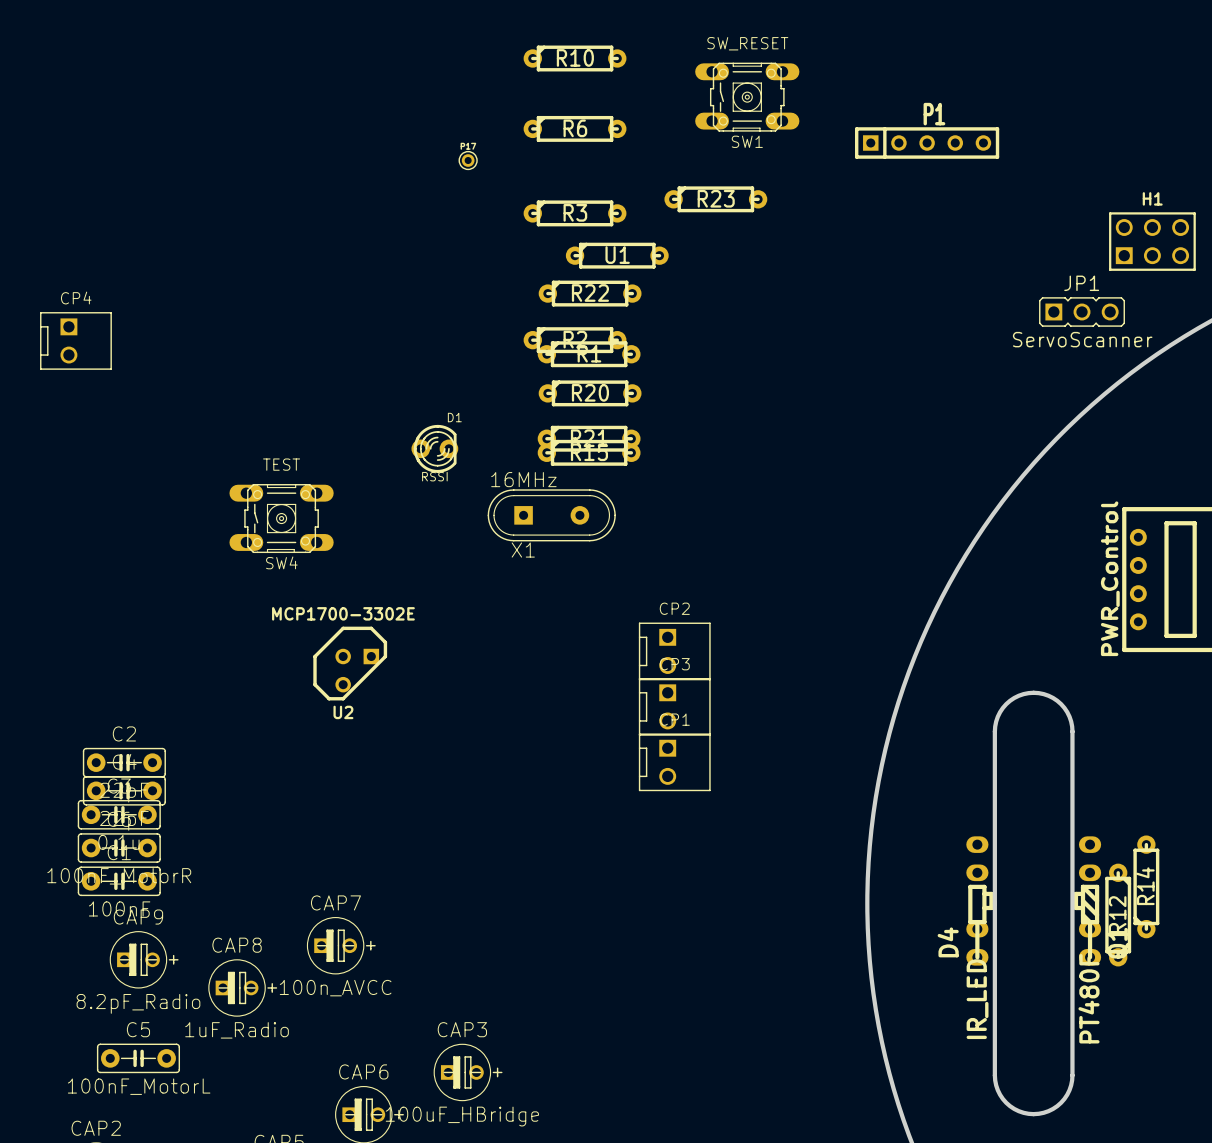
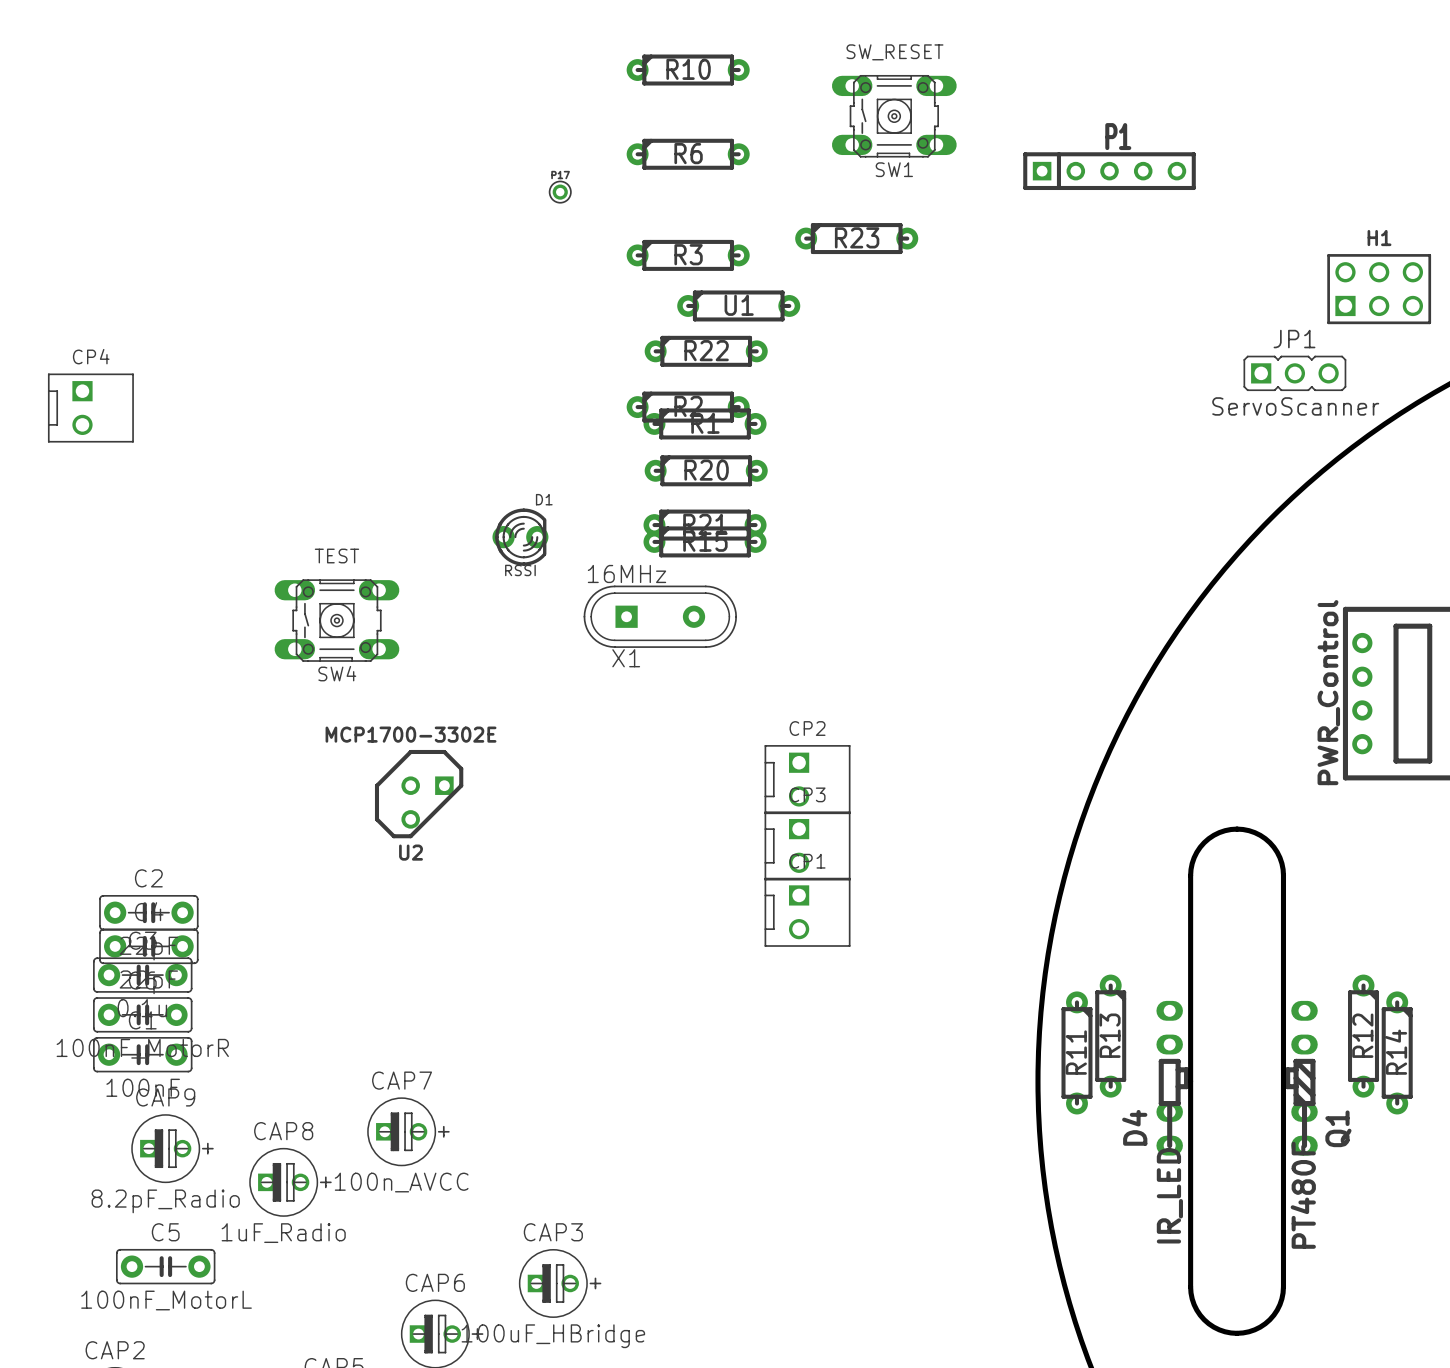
R13: none -> (1110, 1036)
R11: none -> (1076, 1052)
R14 rotation: 0° (1146, 886) -> 180° (1397, 1052)
R12 position: (1118, 915) -> (1363, 1036)

